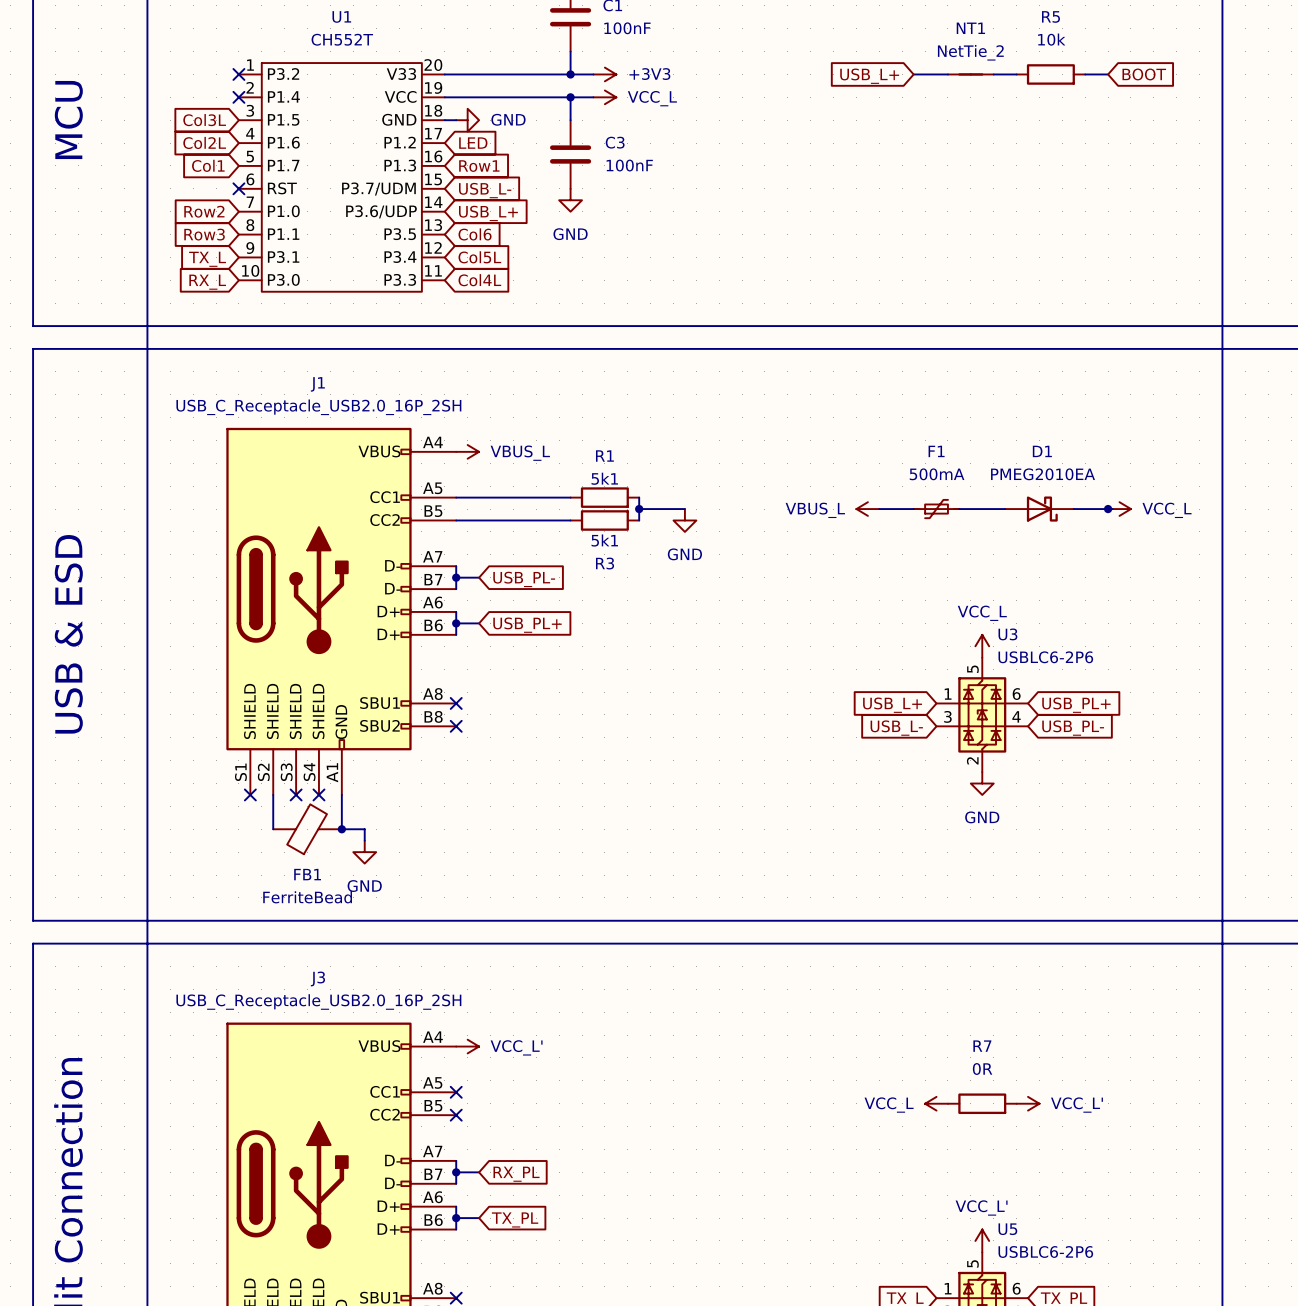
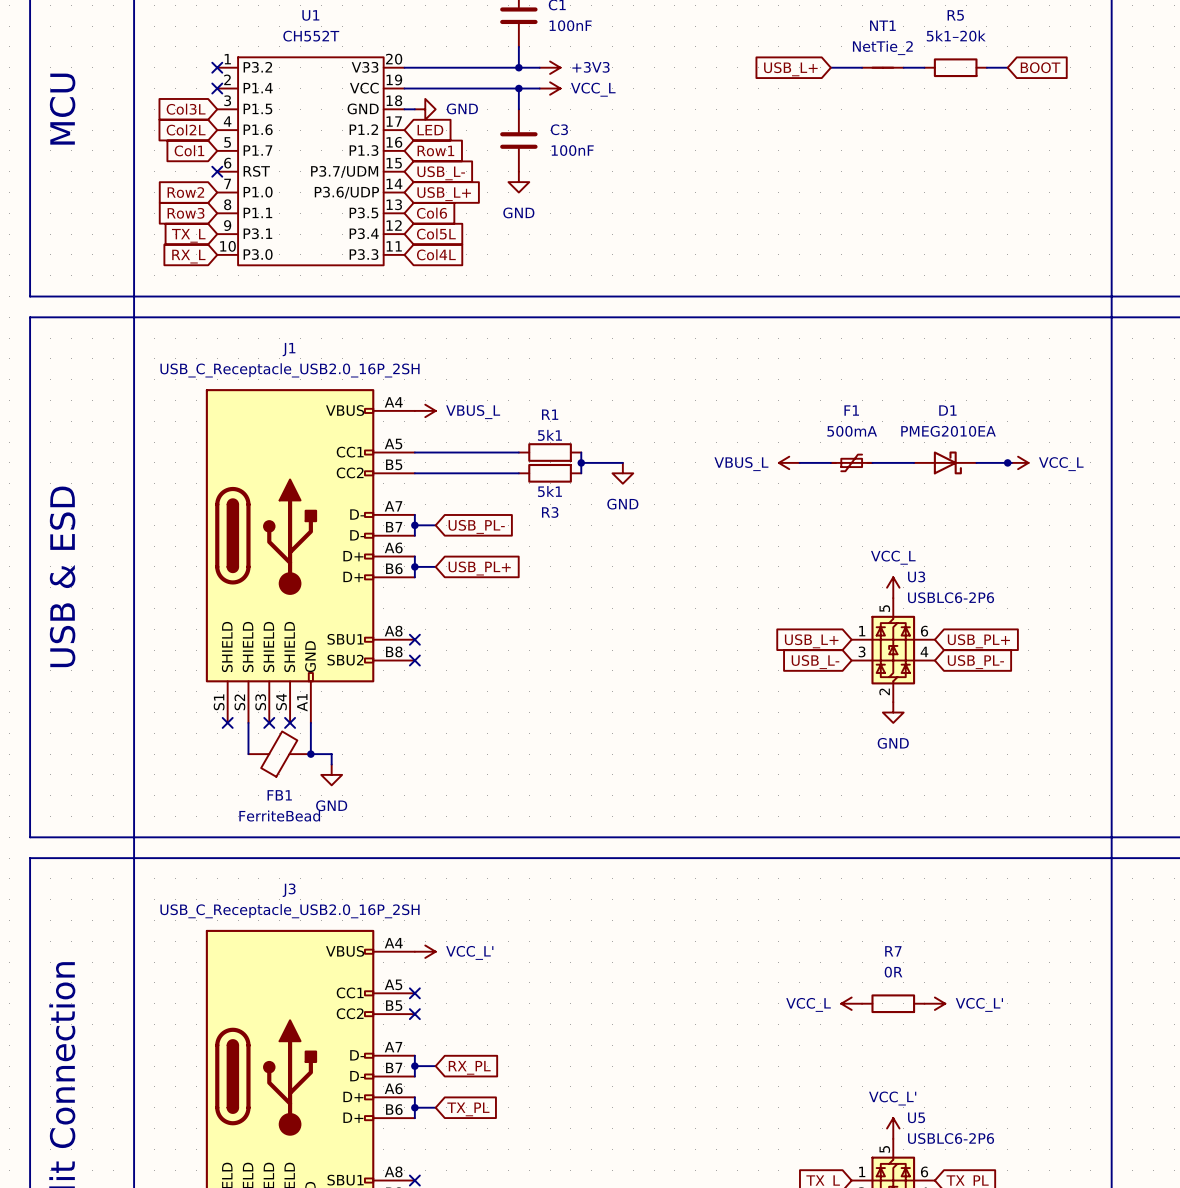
R5 value: 10k (1051, 39) -> 5k1–20k (956, 36)

